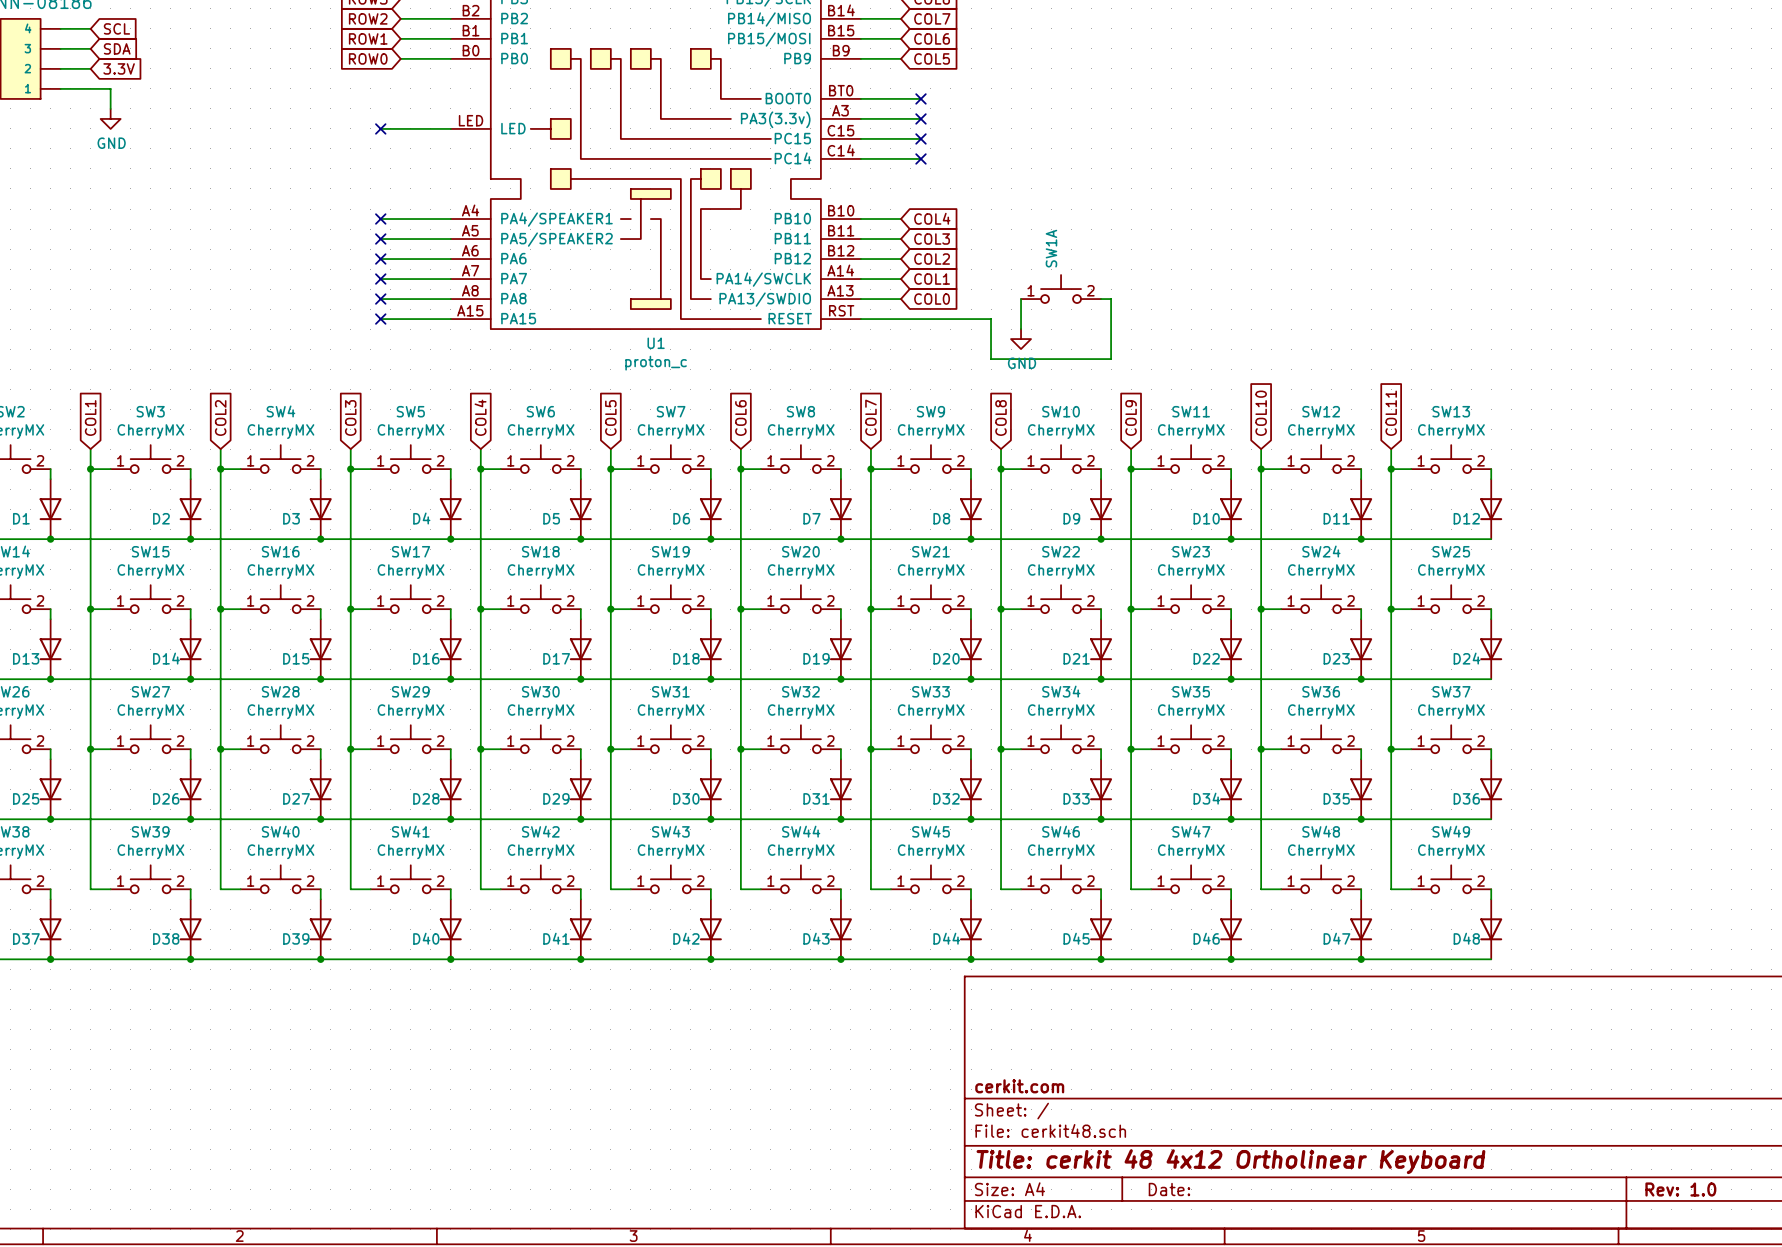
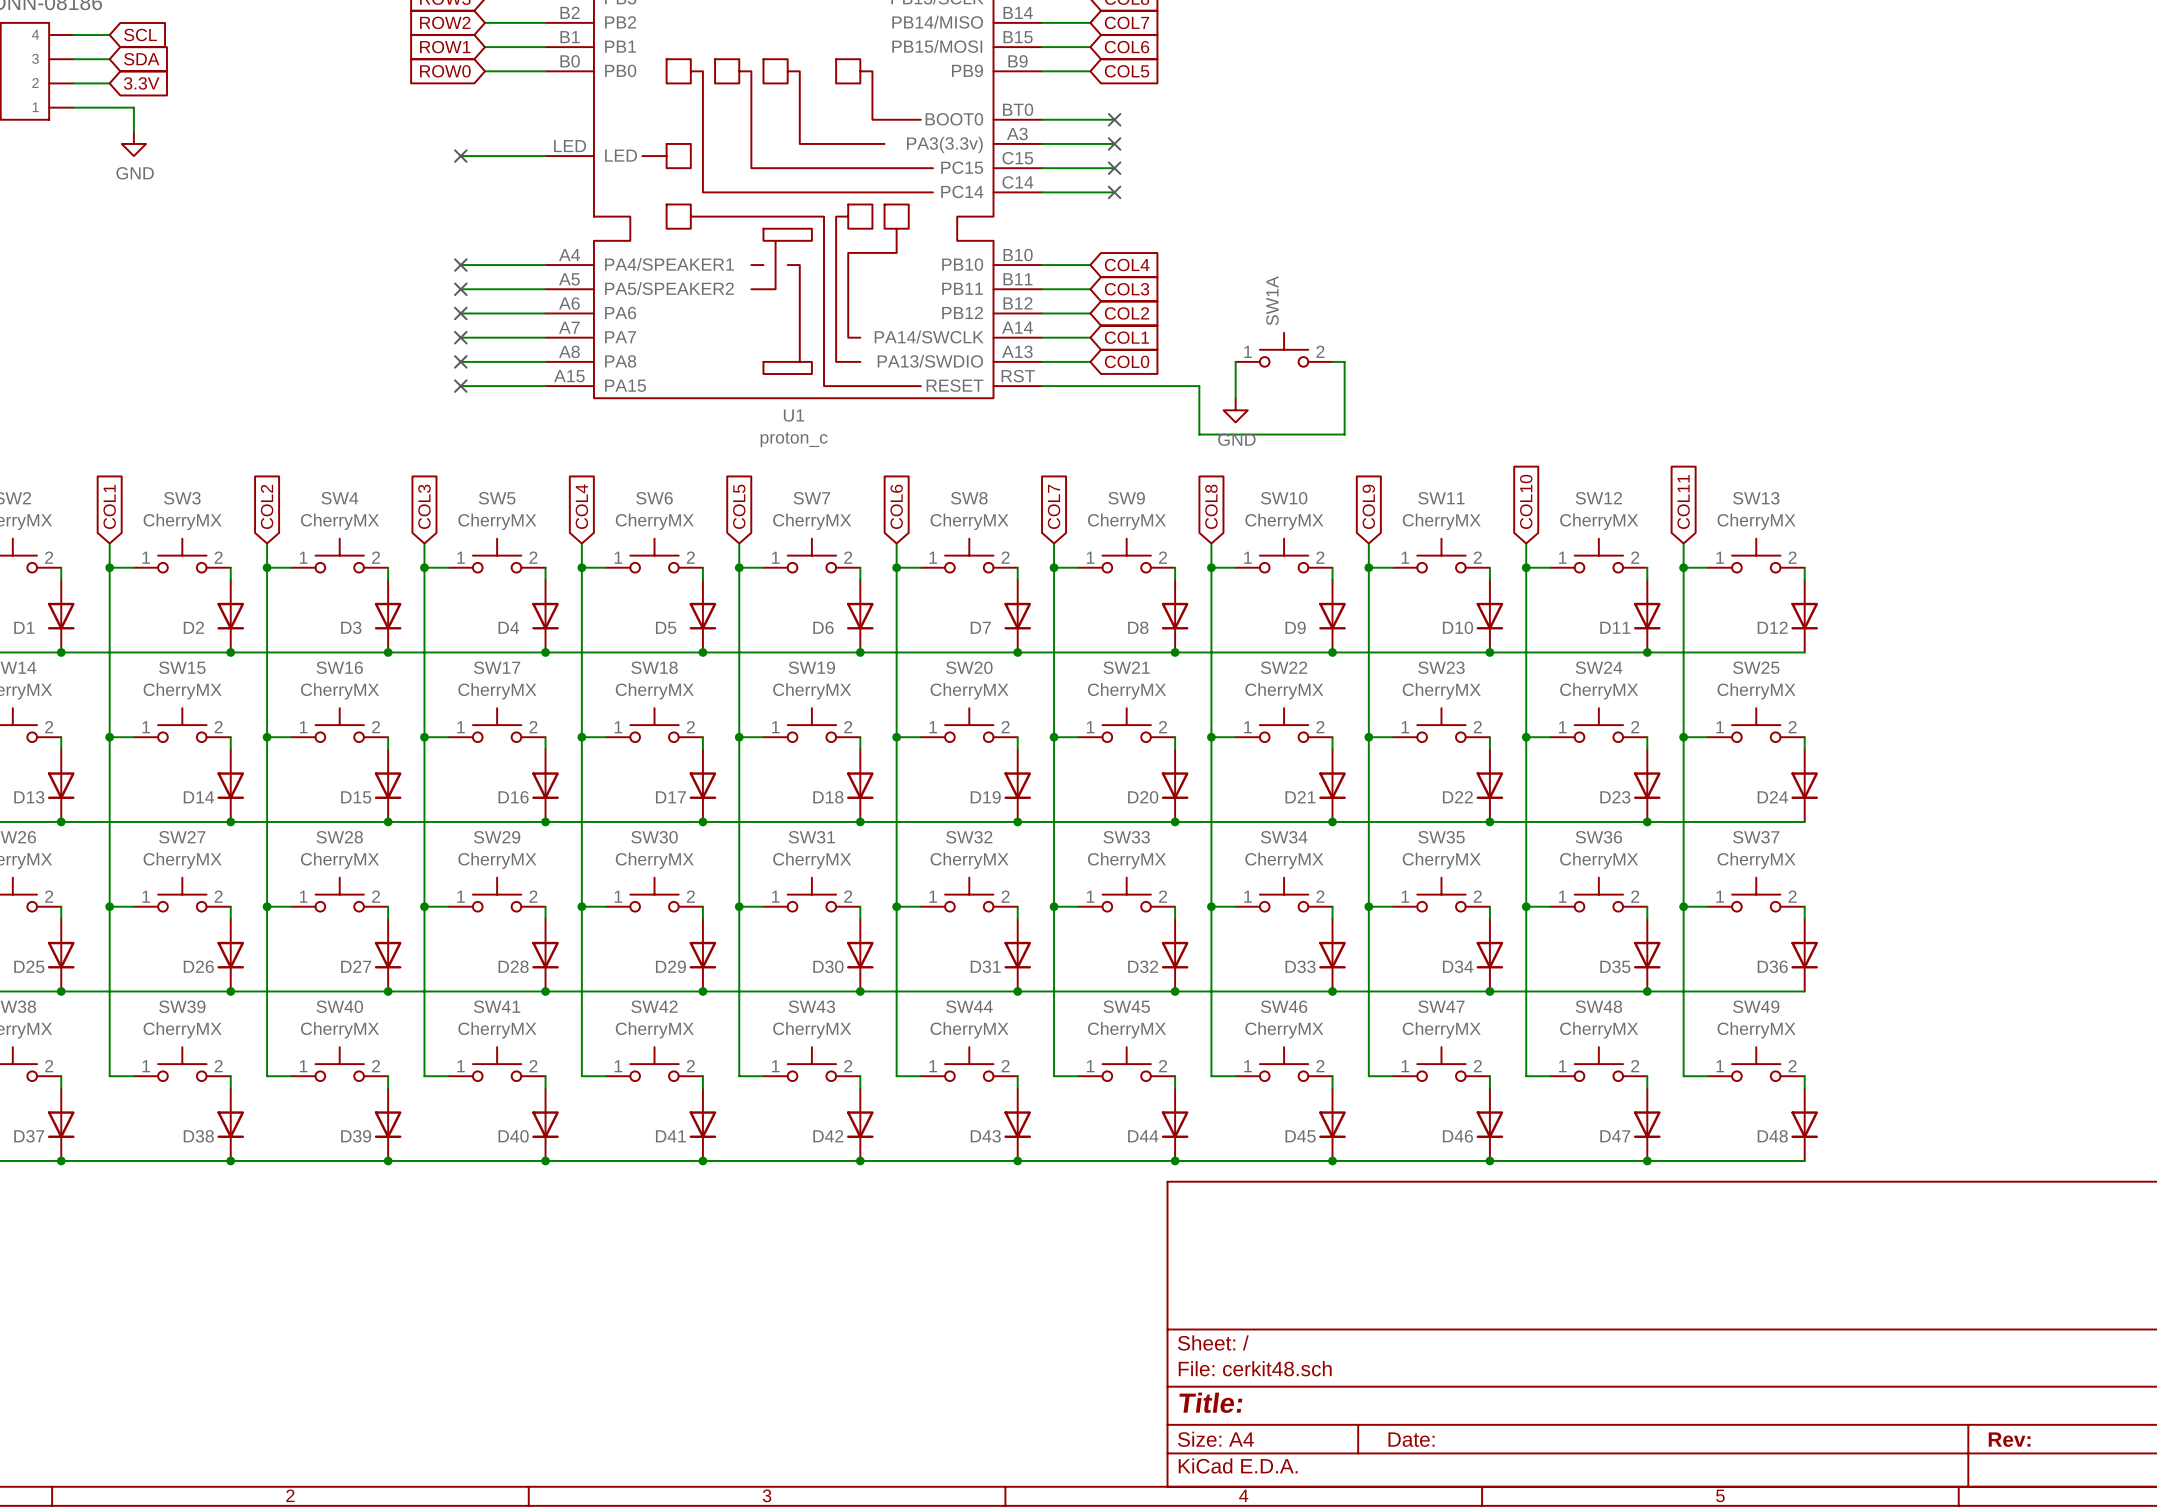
title block: cerkit.com (1019, 1086) -> none
title block: Title: cerkit 48 4x12 Ortholinear Keyboard (1230, 1161) -> Title: (1210, 1402)
title block: Rev: 1.0 (1680, 1189) -> Rev: (2009, 1439)

